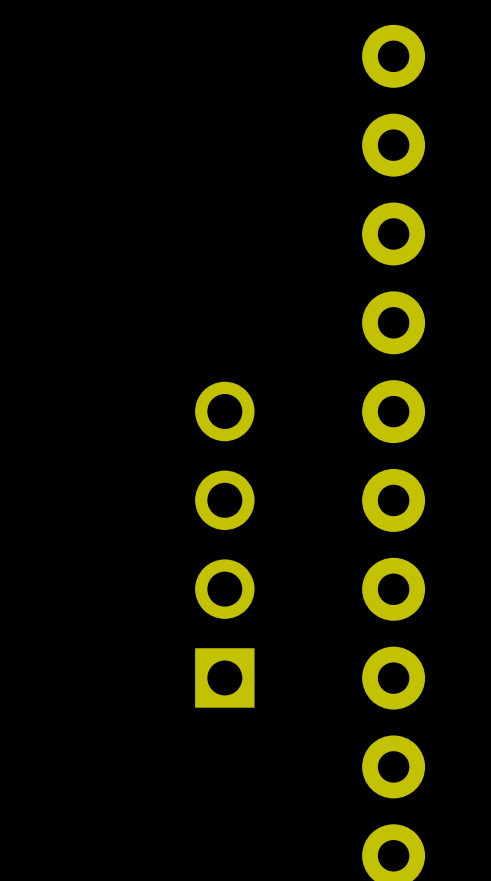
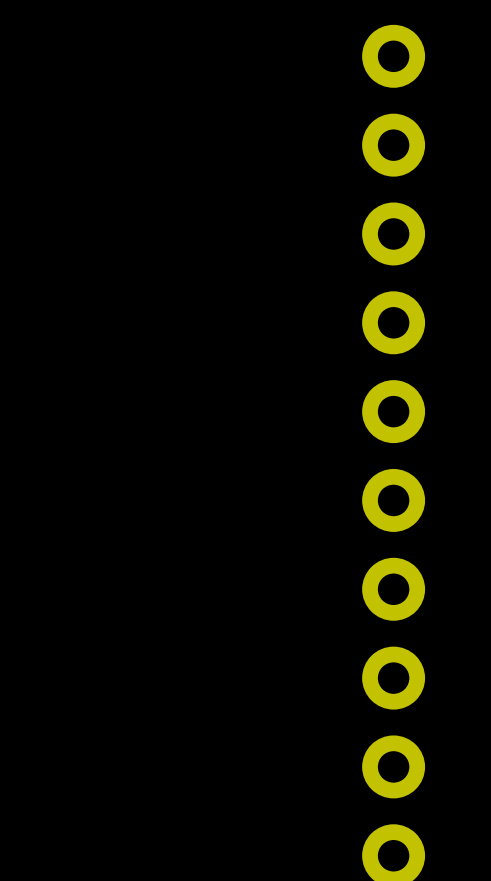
part: (224, 544) -> none

